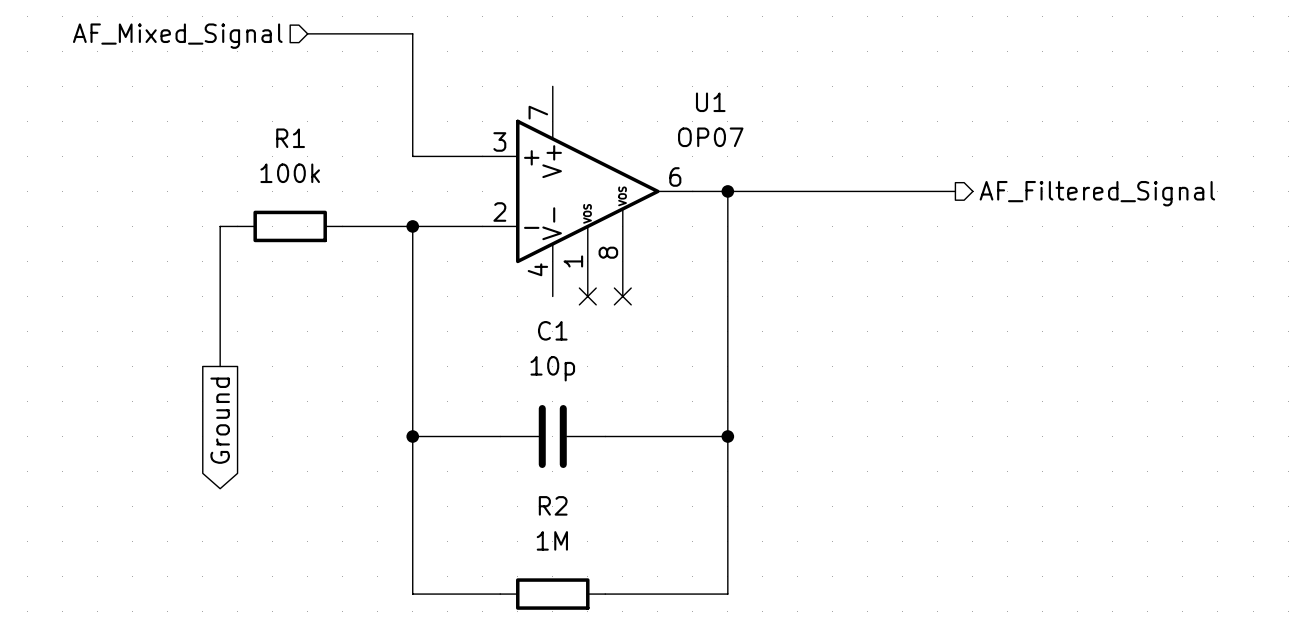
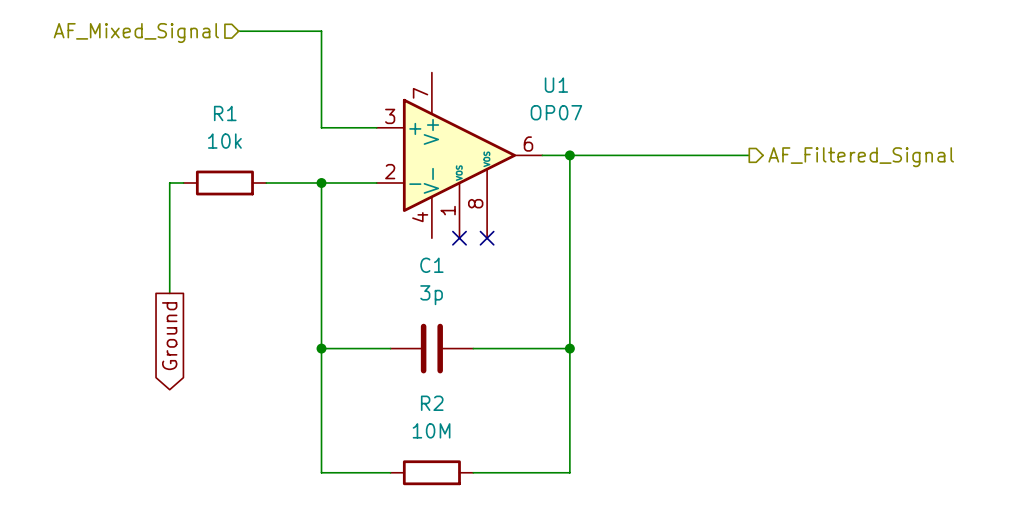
R1 value: 100k (290, 173) -> 10k (224, 141)
C1 value: 10p (552, 368) -> 3p (431, 295)
R2 value: 1M (552, 540) -> 10M (431, 430)

